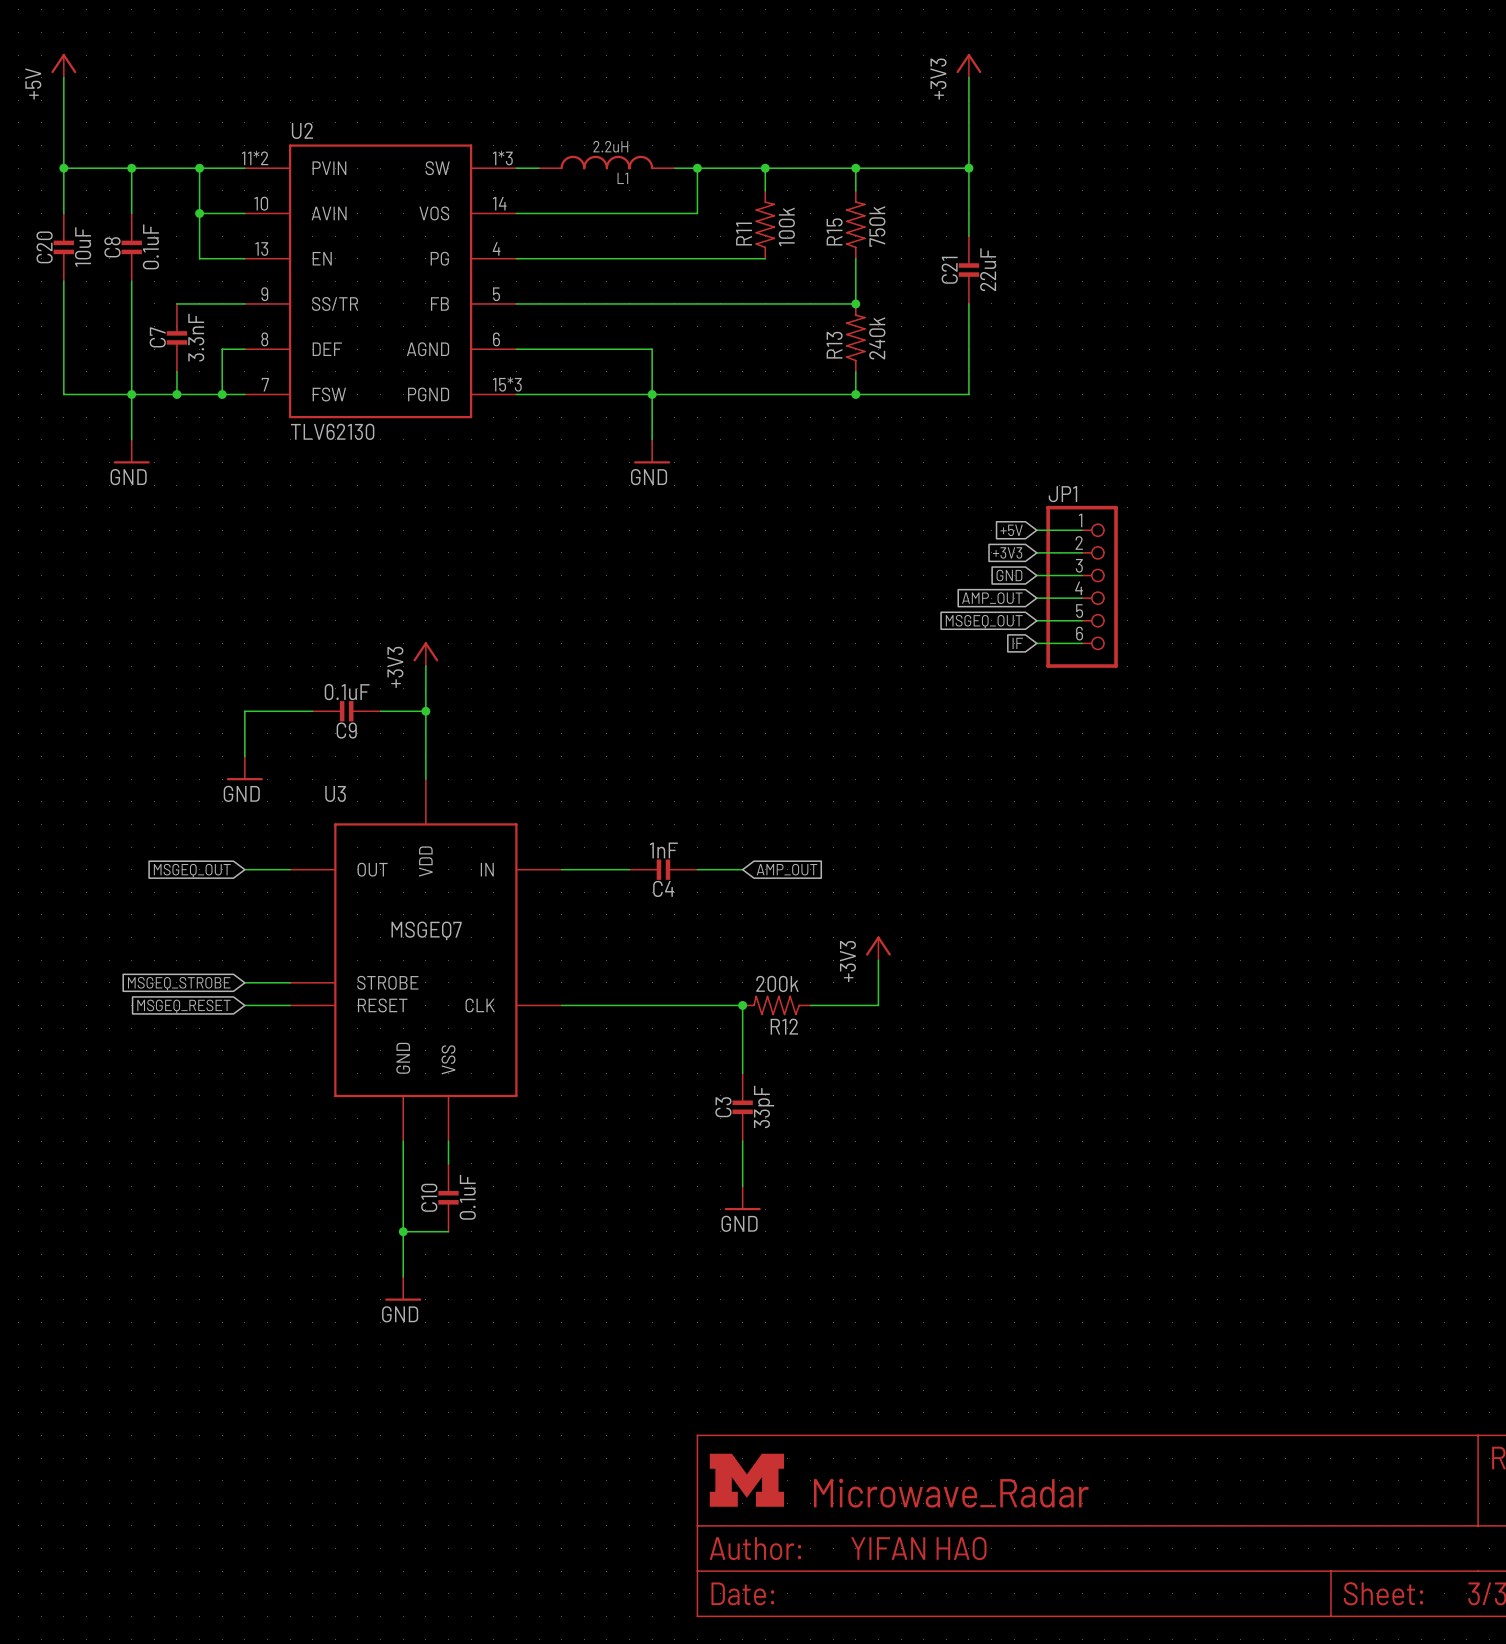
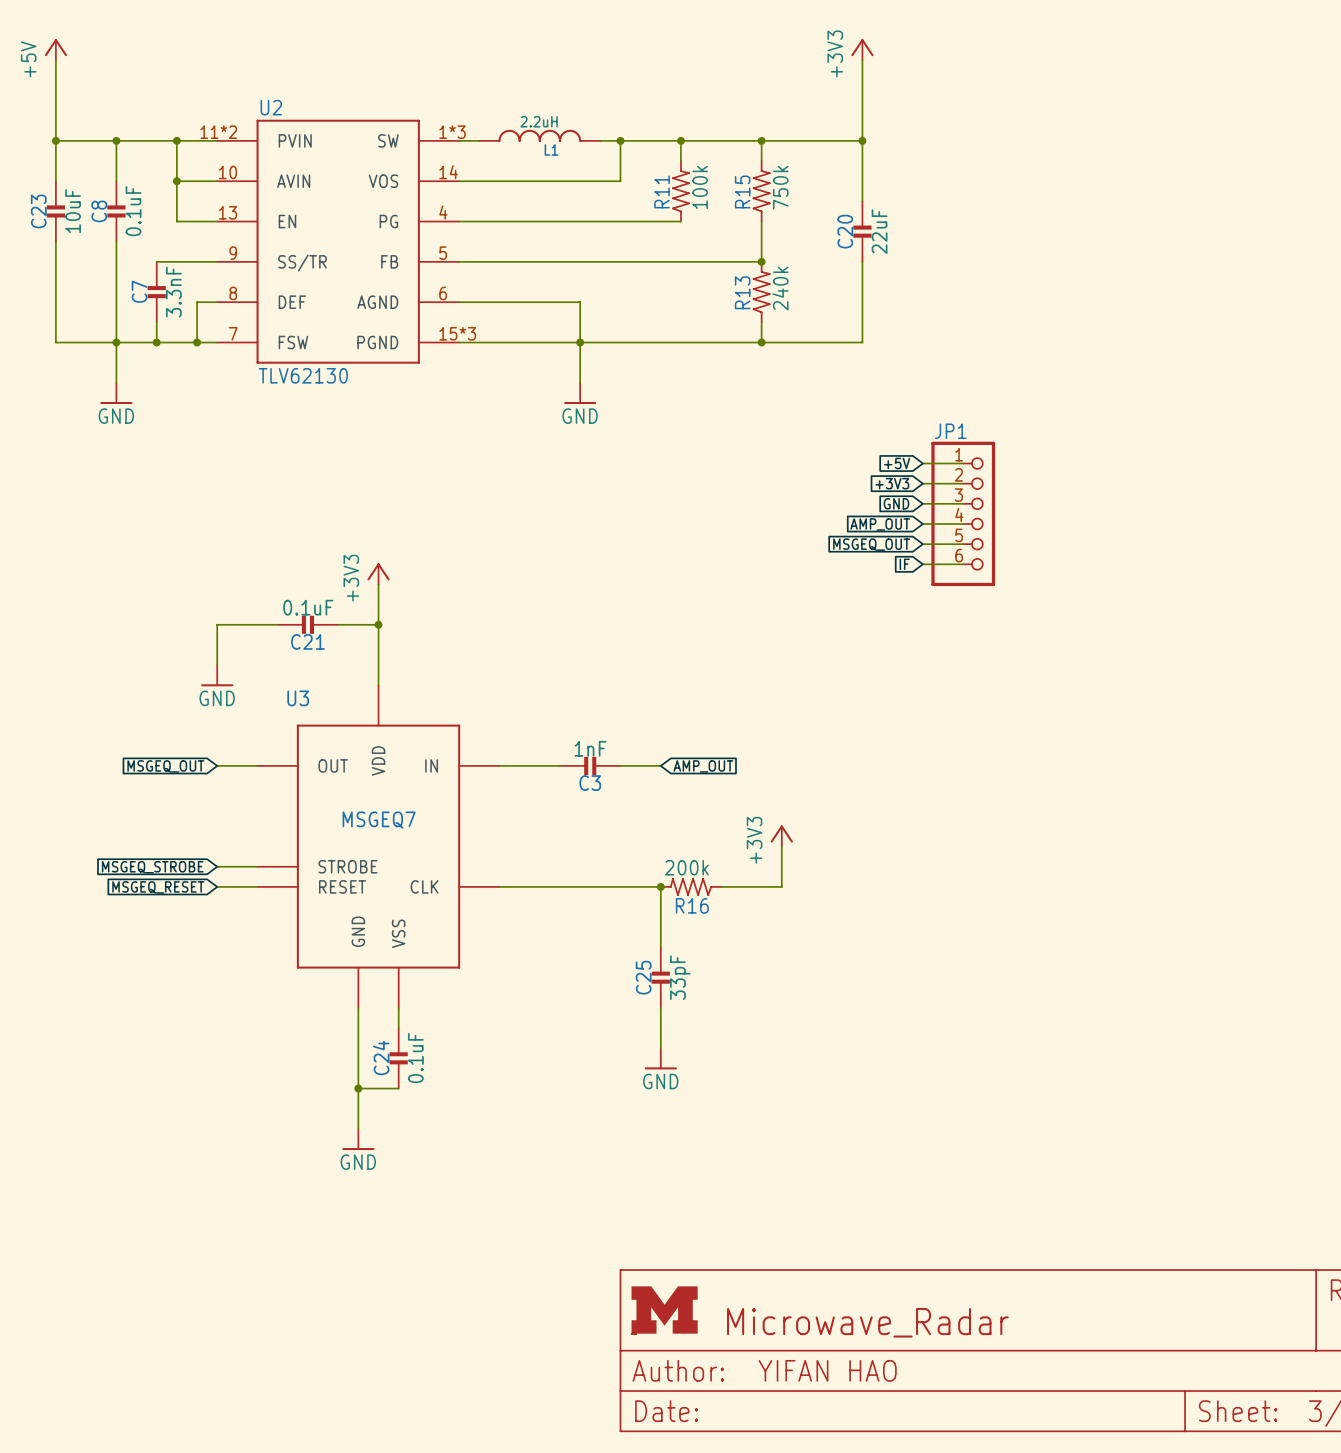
C20 name: C20 (44, 247) -> C23 (38, 211)
C21 name: C21 (949, 270) -> C20 (845, 231)
C9 name: C9 (346, 730) -> C21 (307, 641)
C4 name: C4 (663, 888) -> C3 (590, 783)
R12 name: R12 (784, 1026) -> R16 (692, 905)
C3 name: C3 (723, 1107) -> C25 (643, 977)
C10 name: C10 (429, 1197) -> C24 (381, 1058)

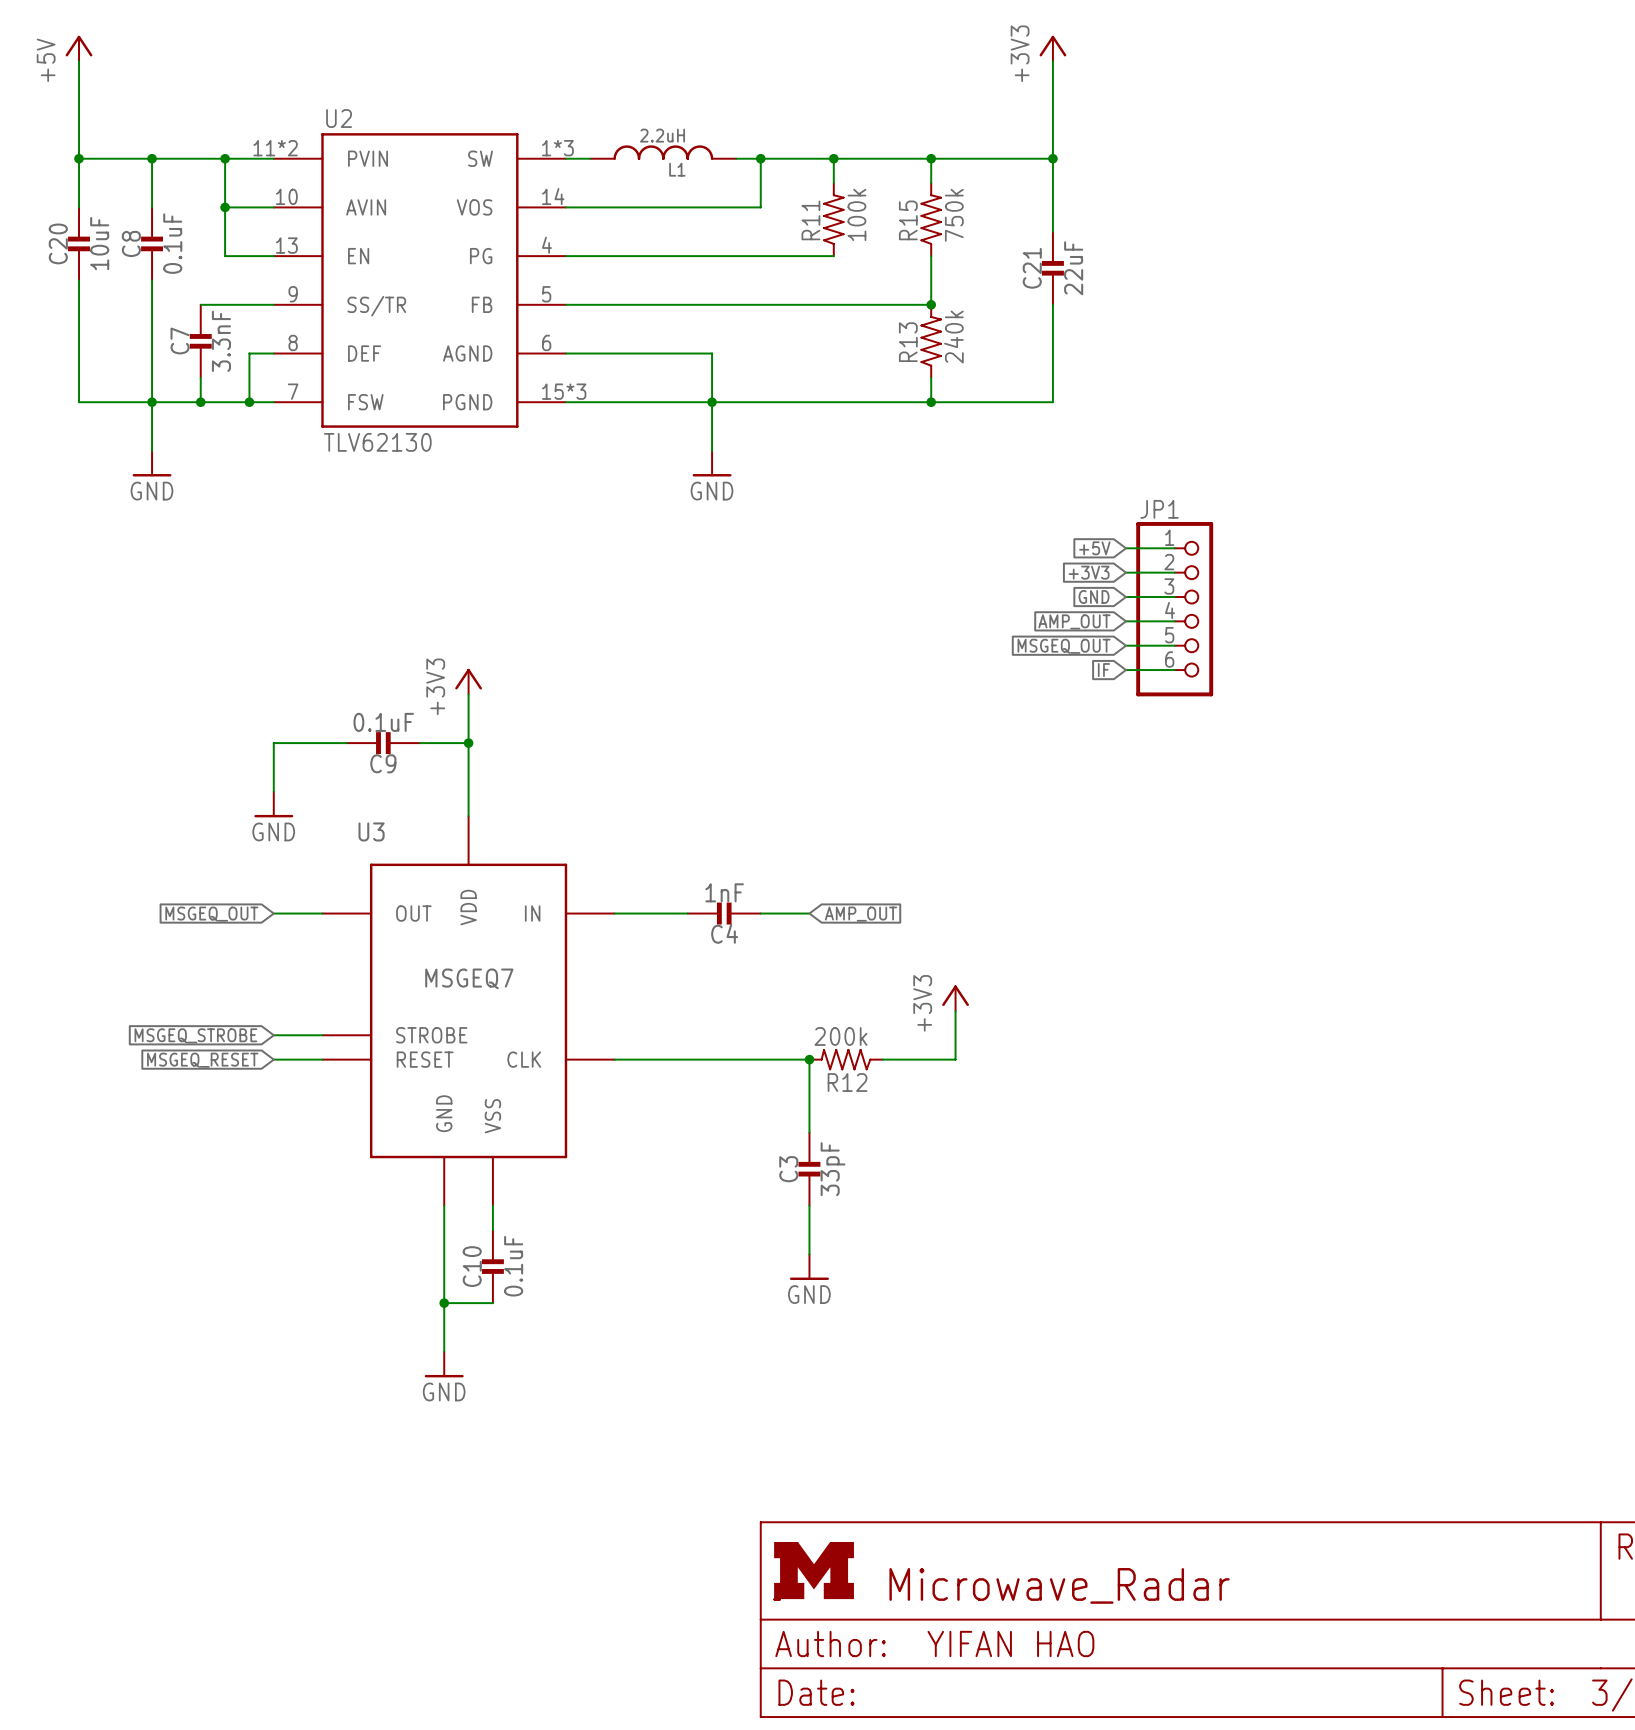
C23 name: C23 (38, 211) -> C20 (58, 243)
C20 name: C20 (845, 231) -> C21 (1032, 268)
C21 name: C21 (307, 641) -> C9 (383, 763)
C3 name: C3 (590, 783) -> C4 (724, 933)
R16 name: R16 (692, 905) -> R12 (847, 1082)
C25 name: C25 (643, 977) -> C3 (788, 1169)
C24 name: C24 (381, 1058) -> C10 (472, 1266)

